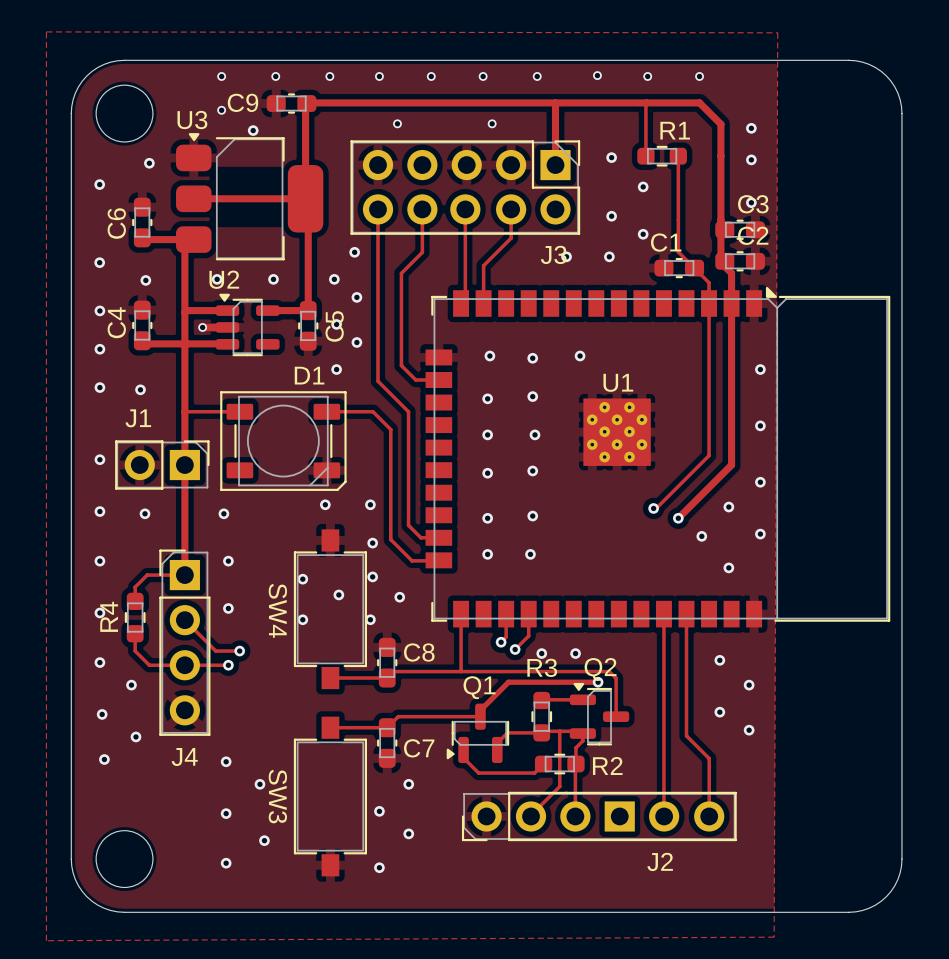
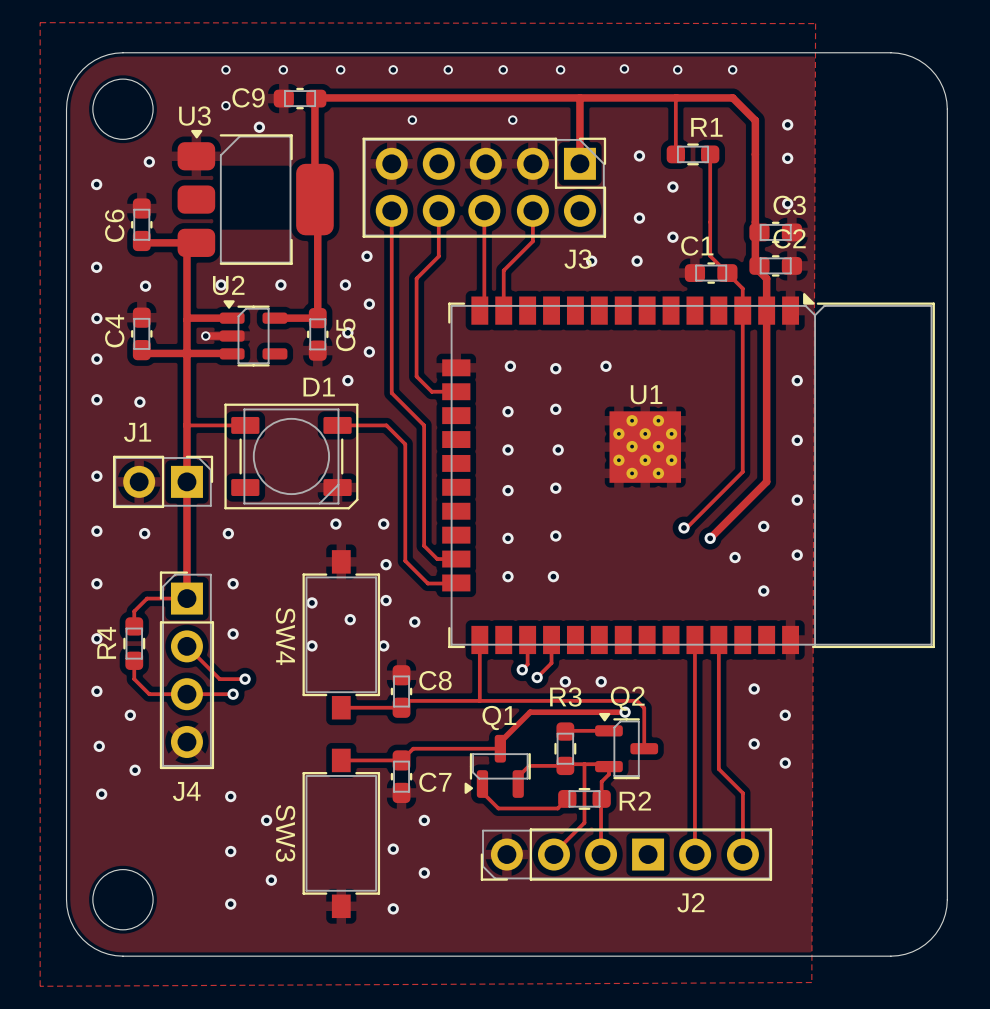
track: (193, 198) (305, 198) -> none

